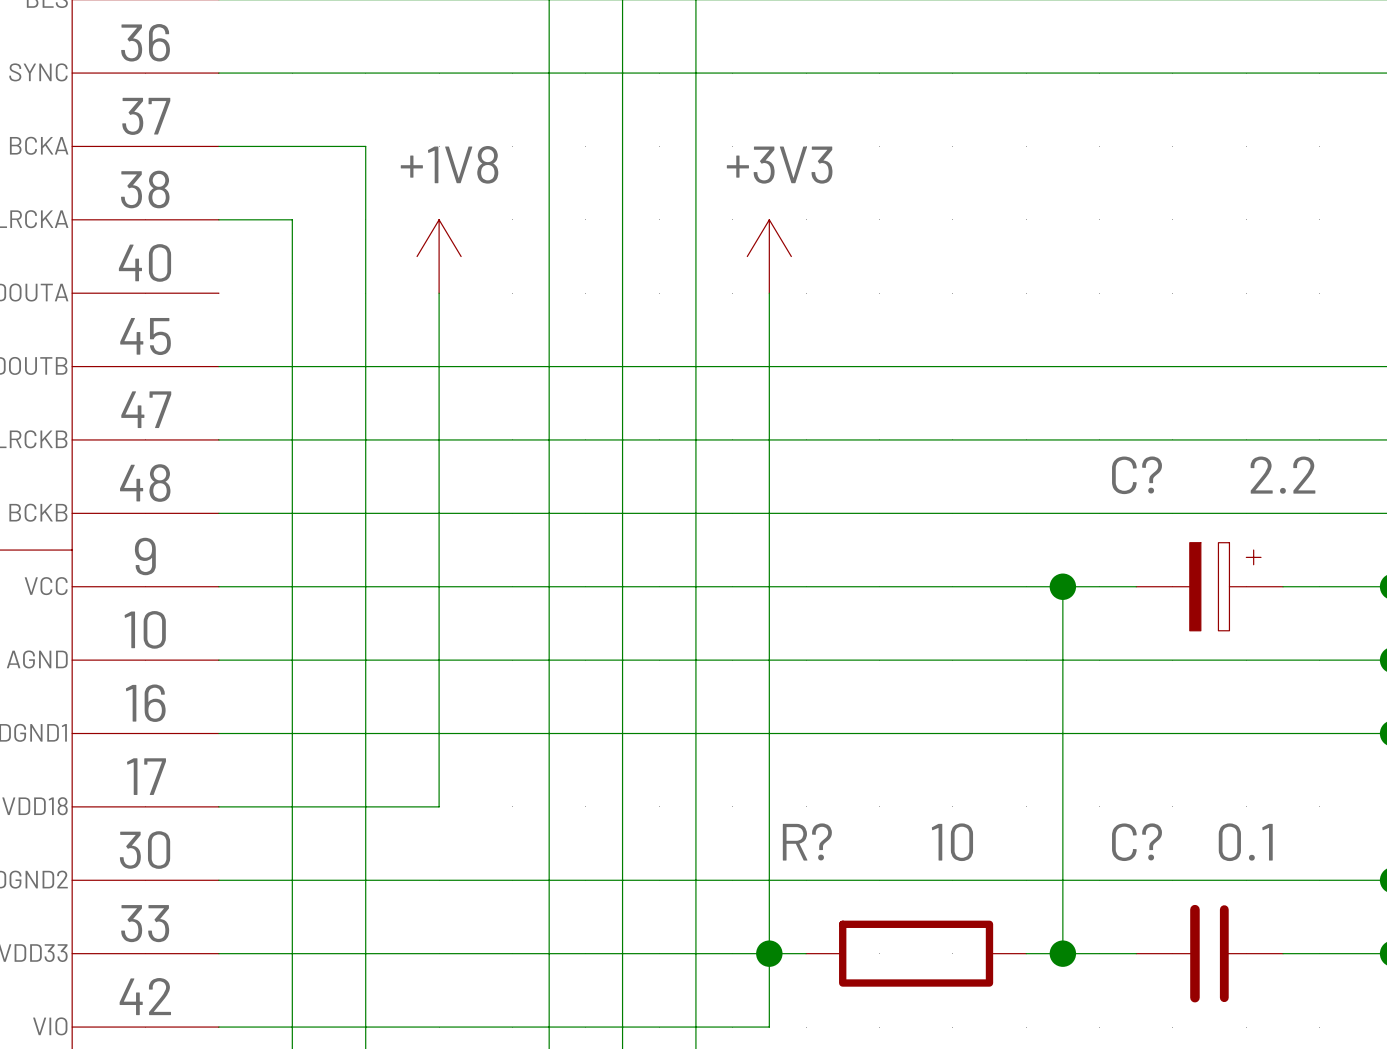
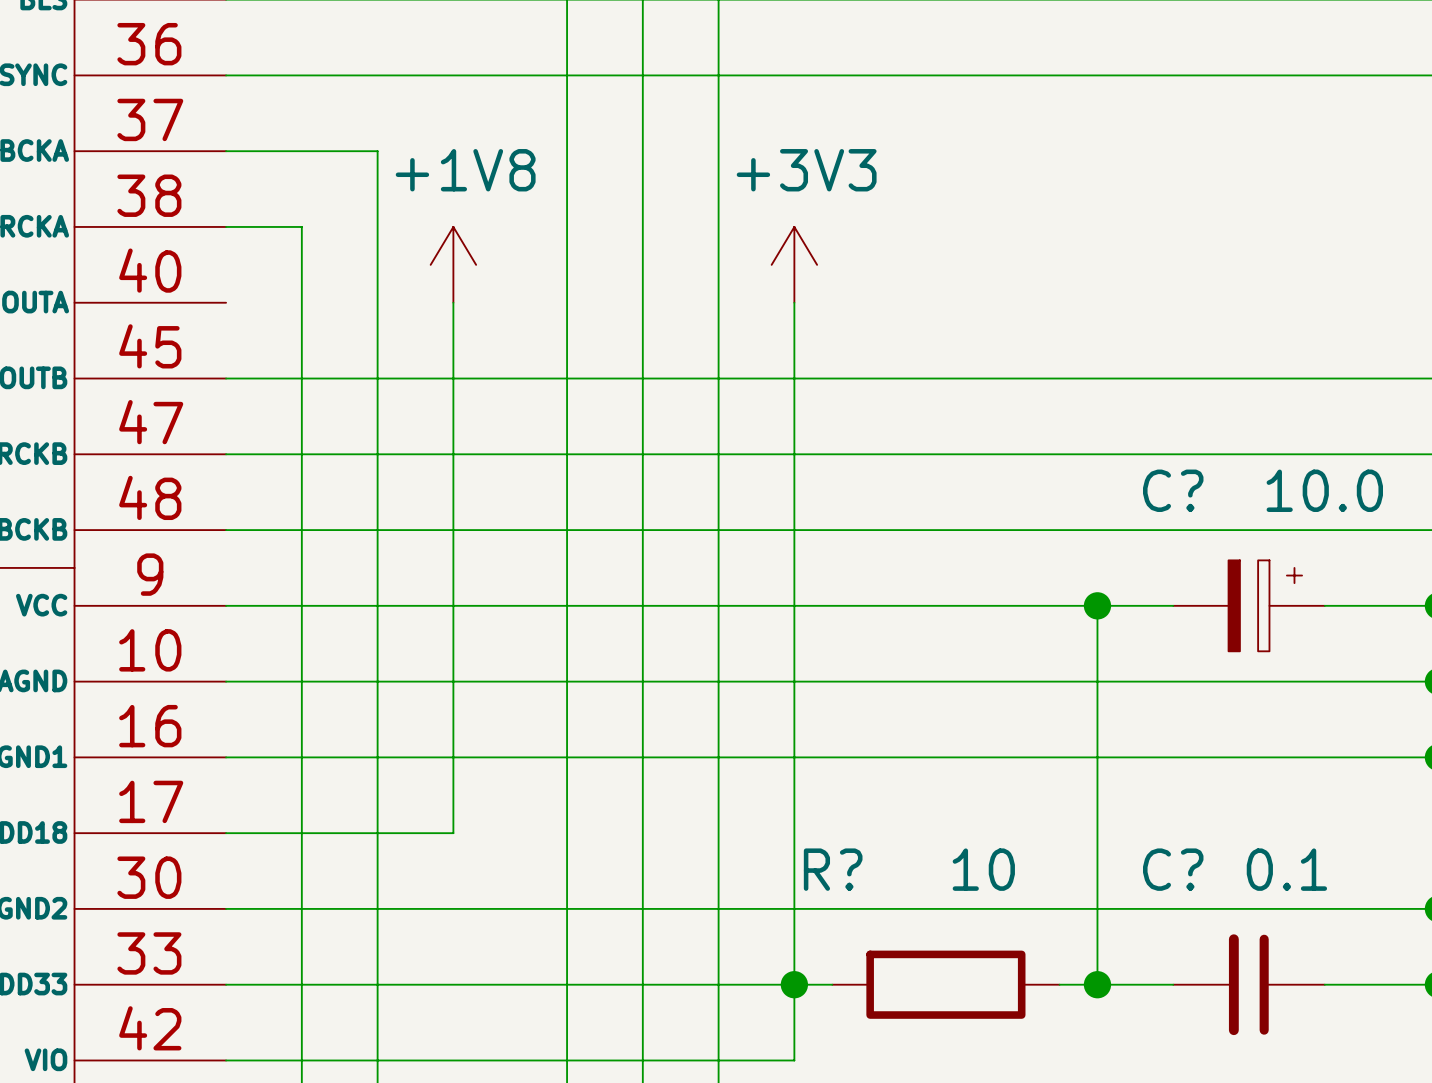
C? value: 2.2 (1282, 475) -> 10.0 (1324, 490)

